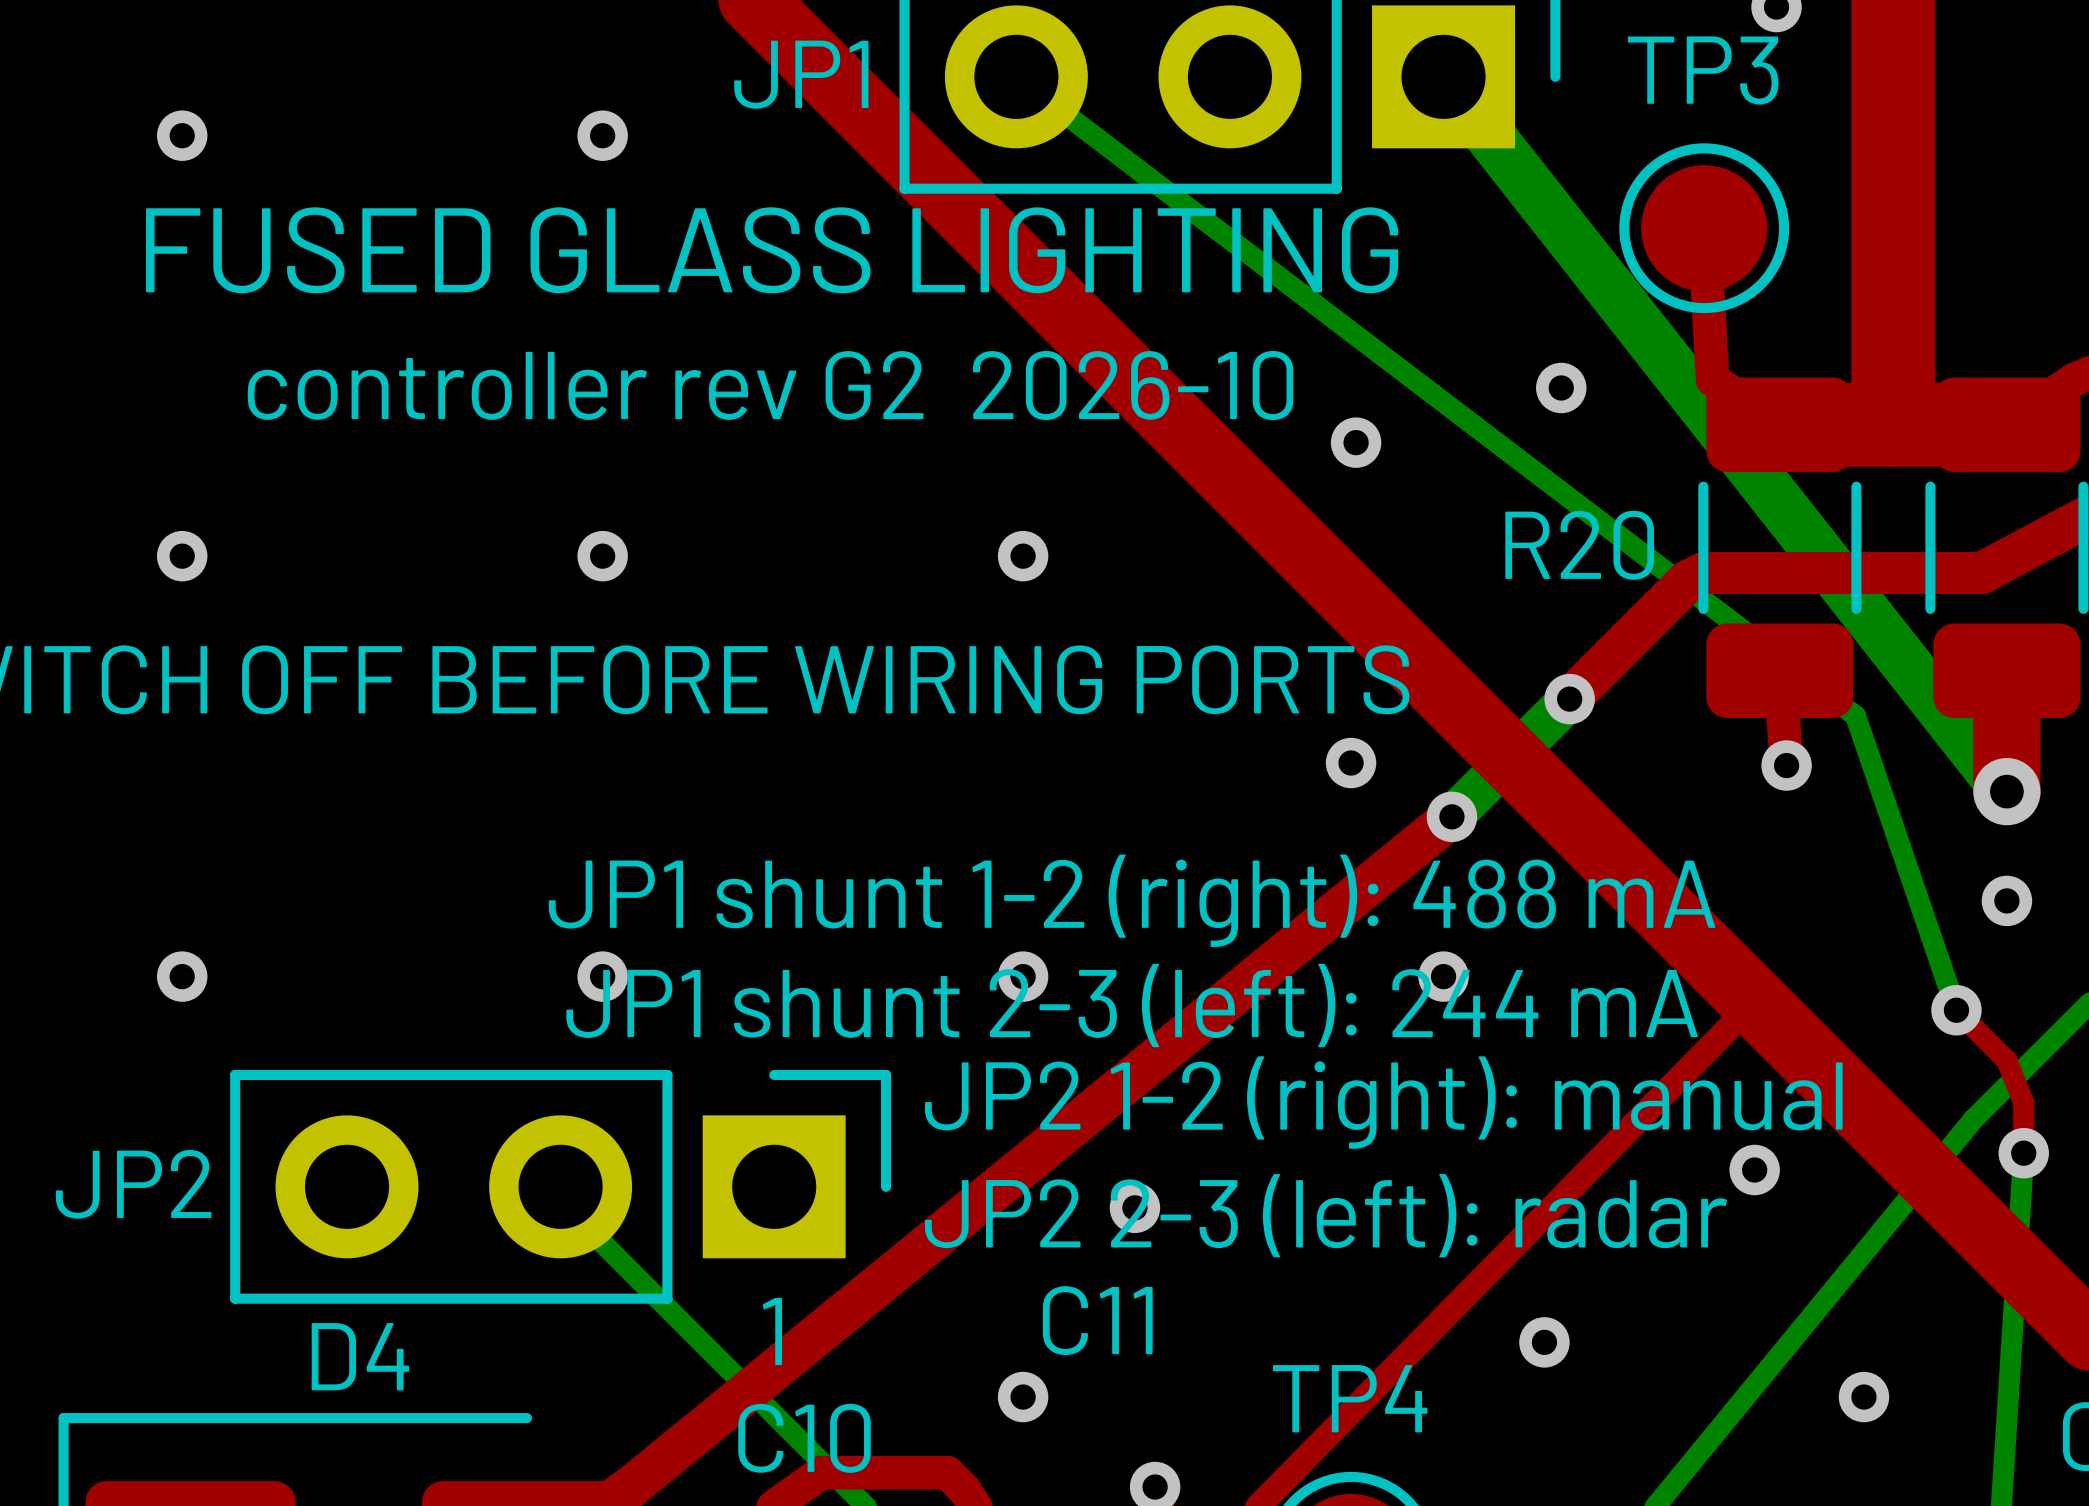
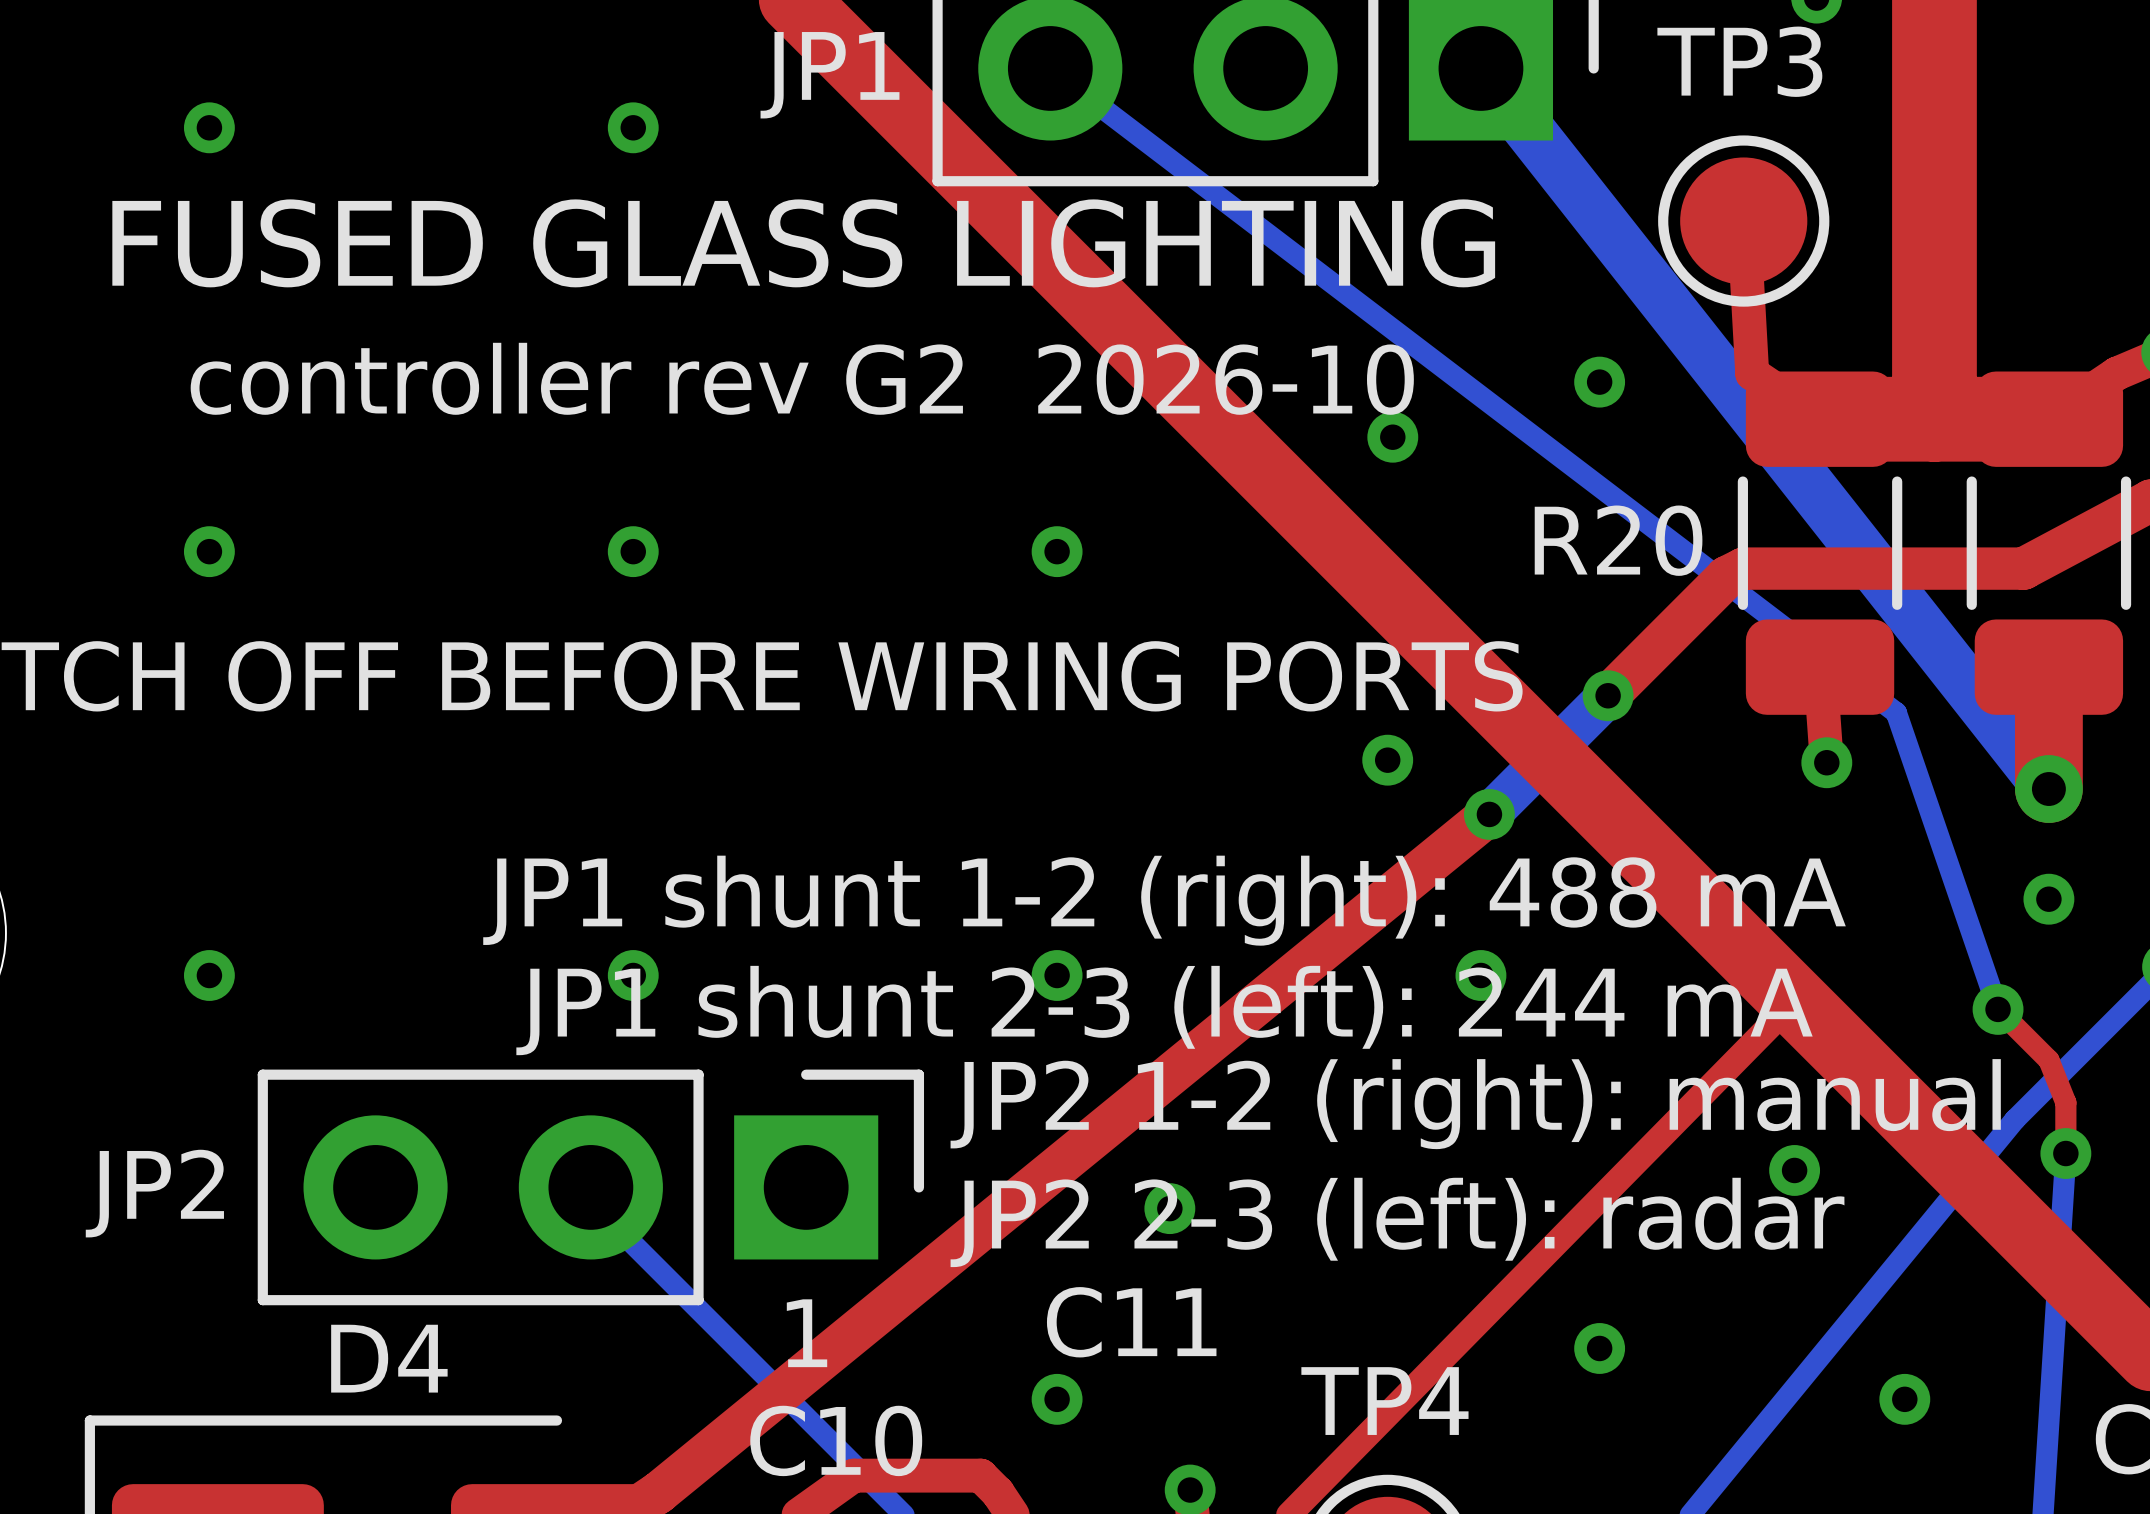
via position: (1544, 1342) -> (1599, 1348)

